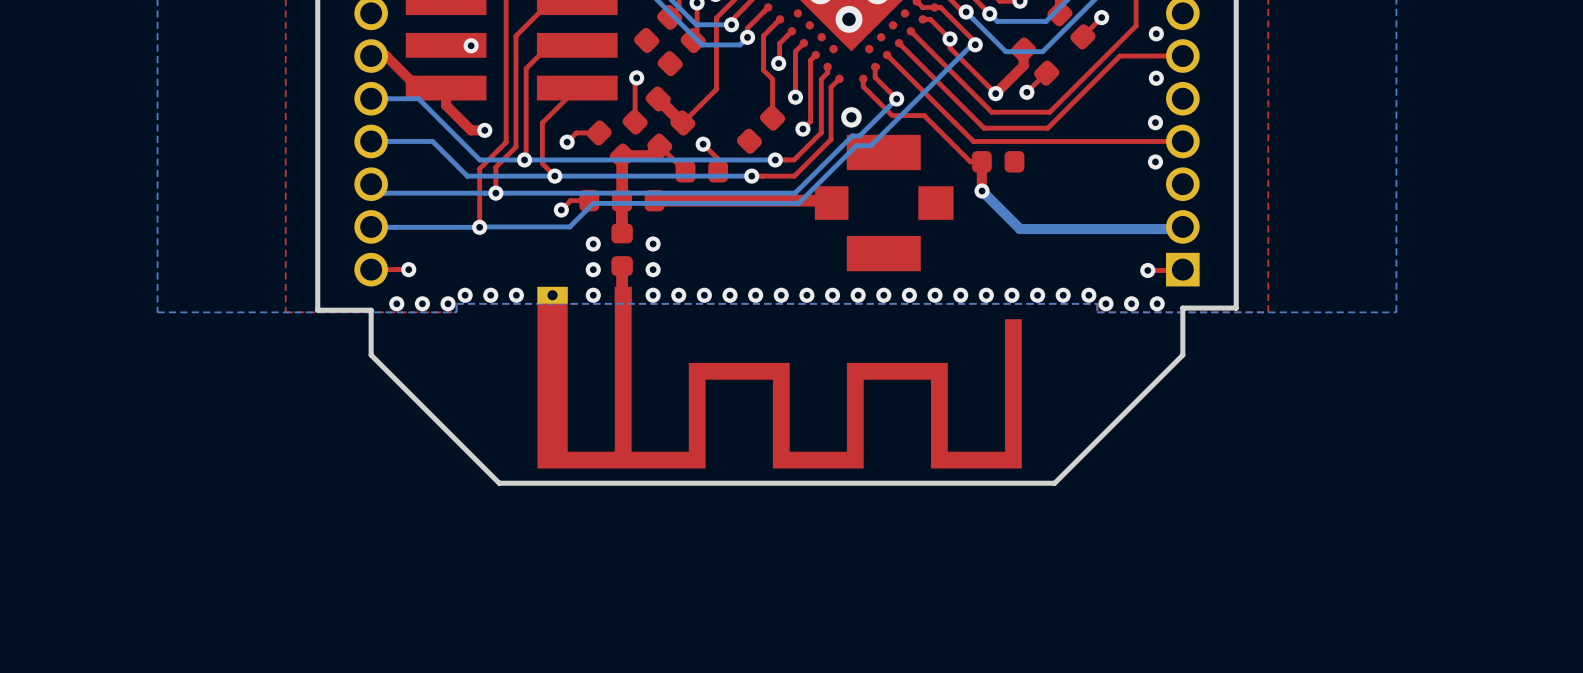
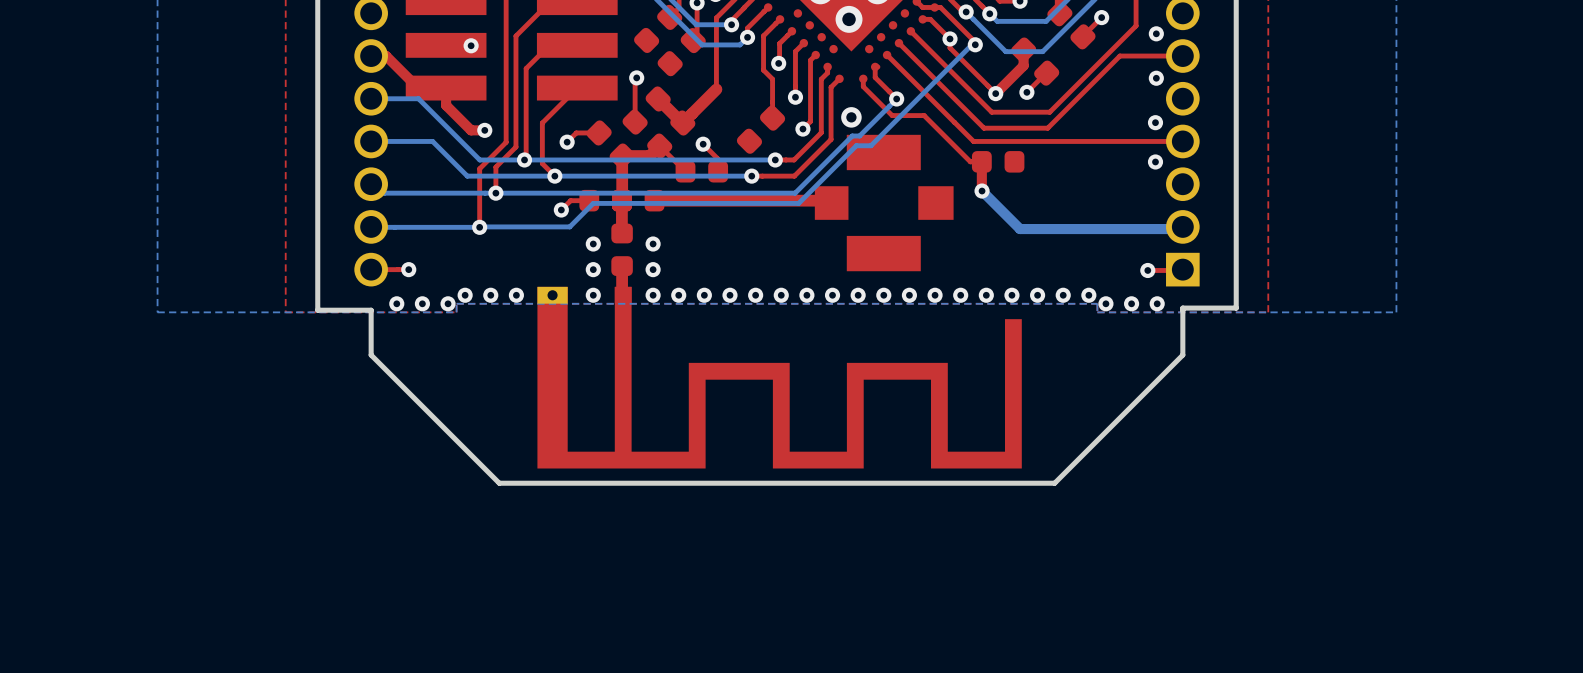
top track width: thin (716, 89) (682, 123) -> thick (716, 89) (682, 123)

